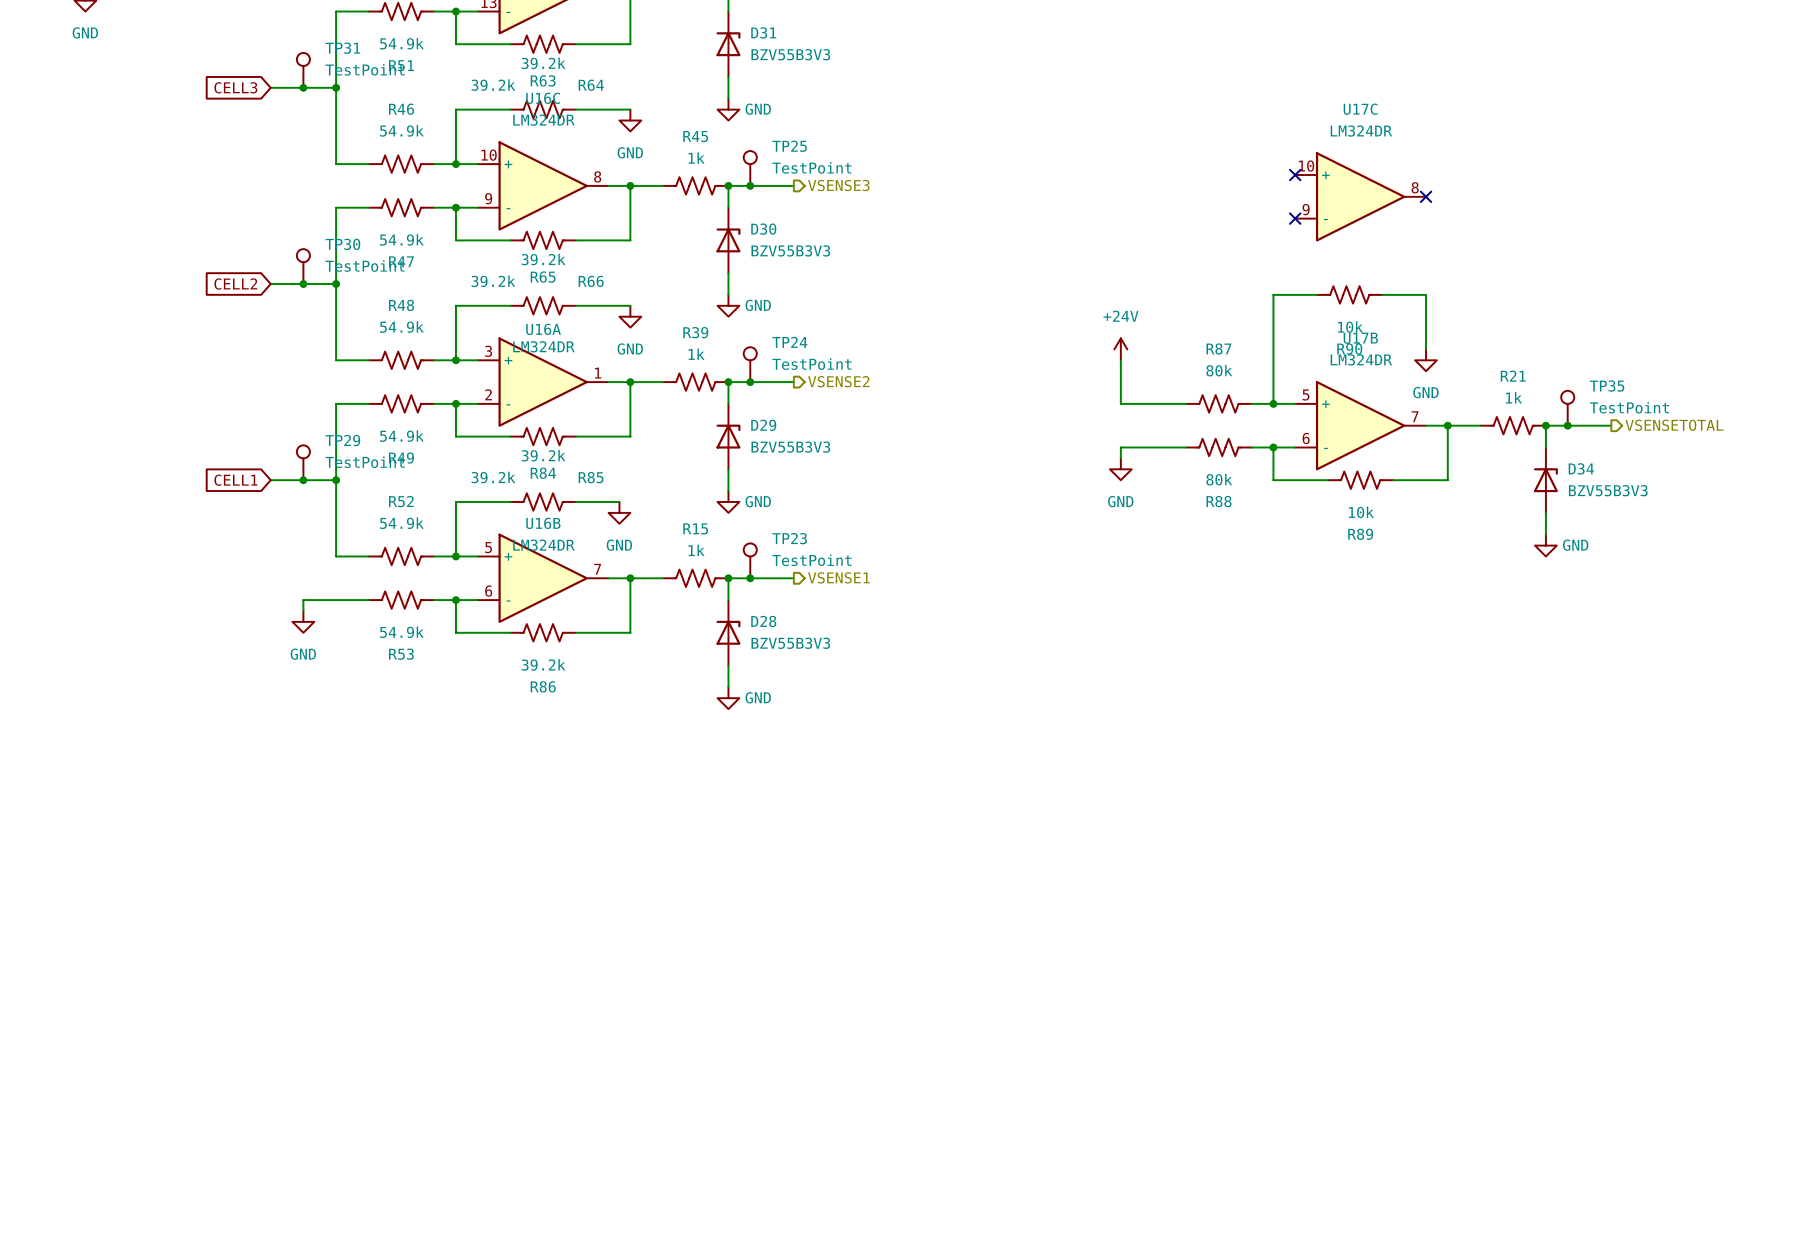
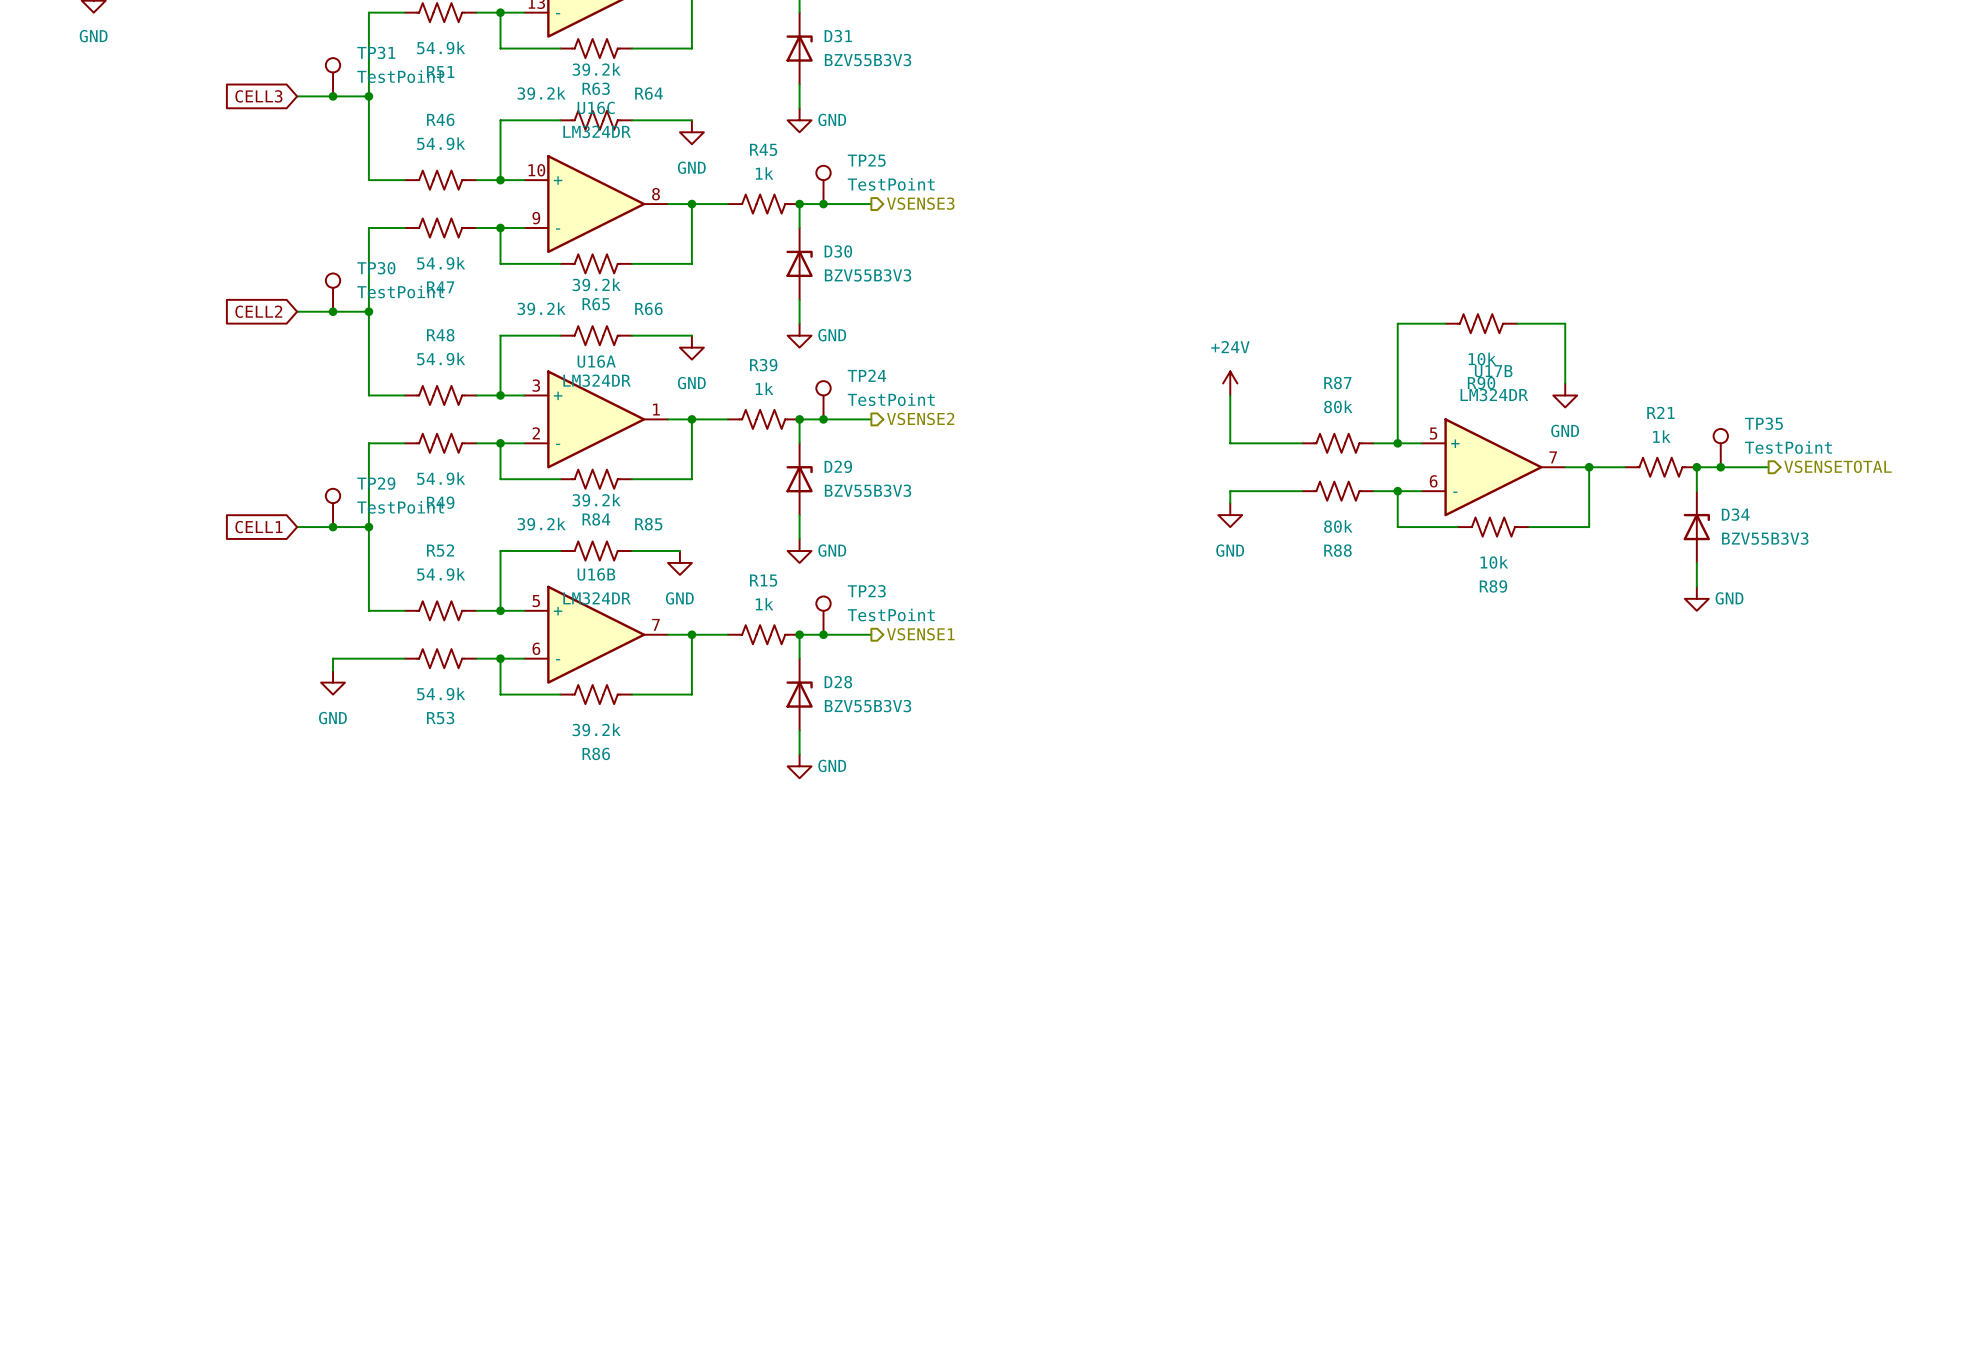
no-connect mark: (1295, 175) -> none
U17C: LM324DR (1360, 196) -> none
no-connect mark: (1426, 196) -> none
no-connect mark: (1295, 218) -> none

